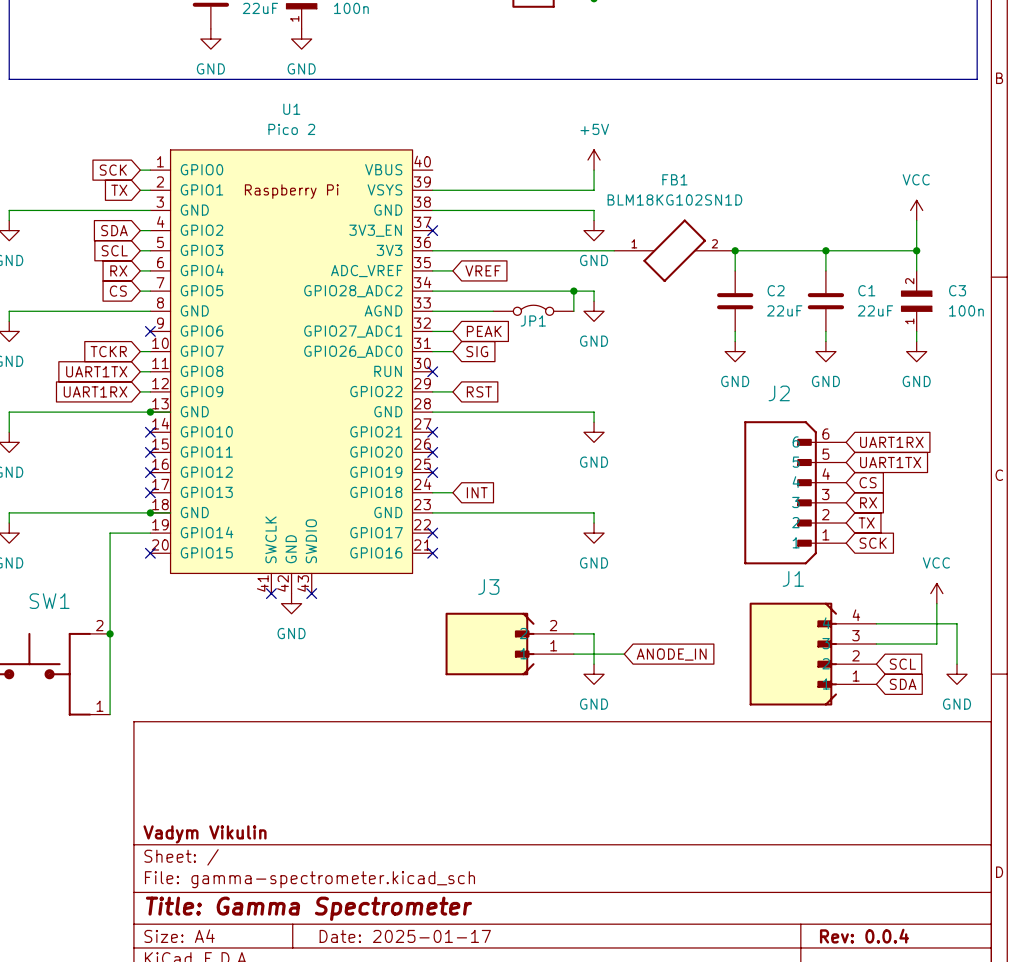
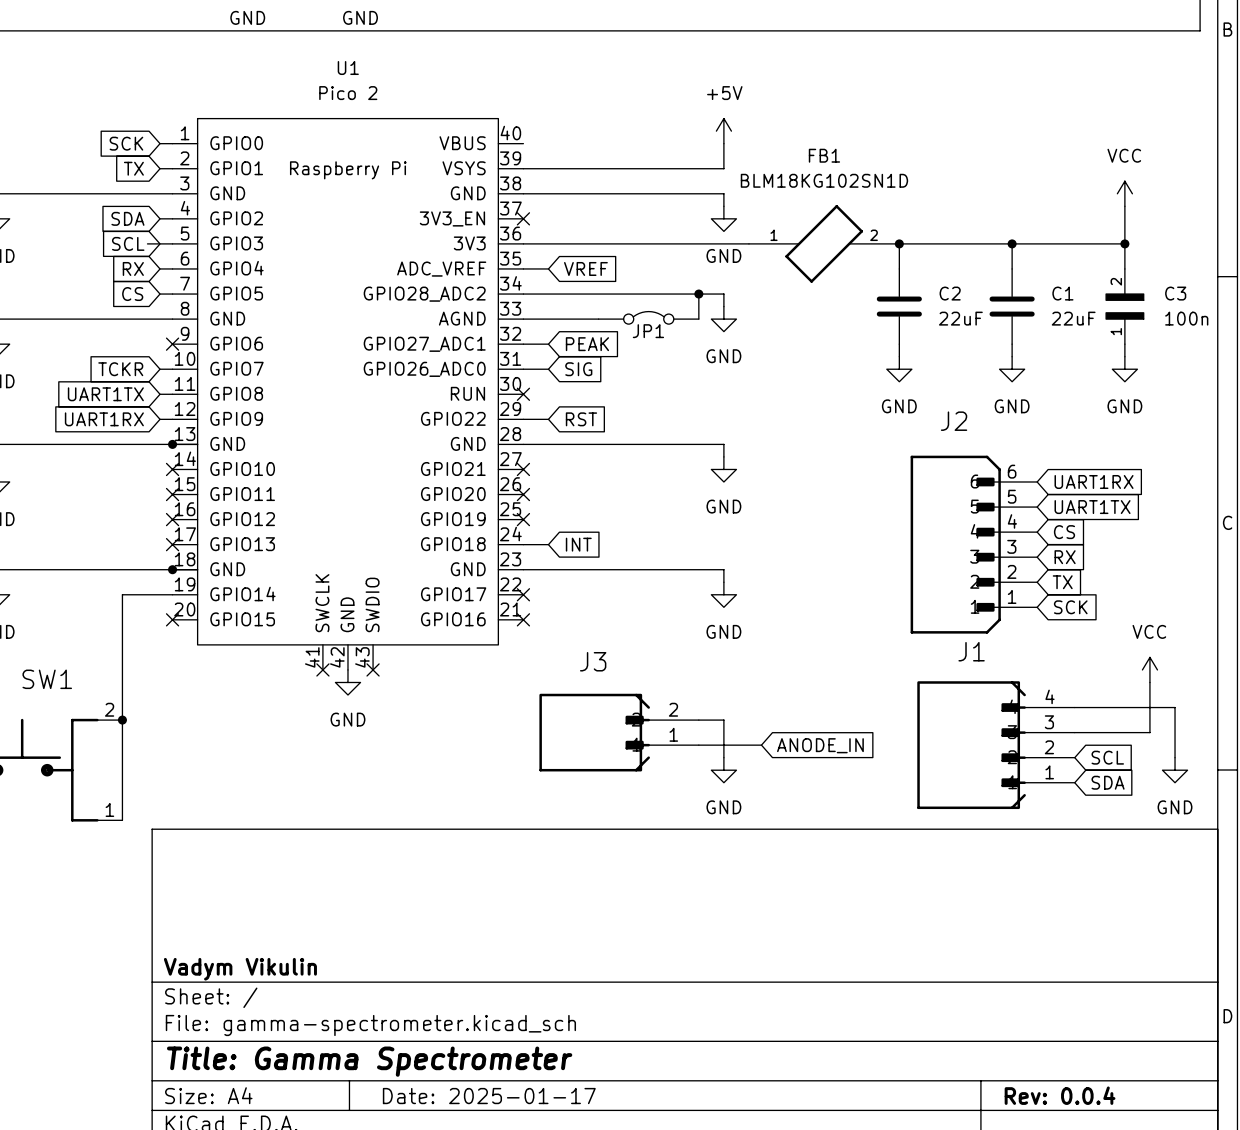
wire: none -> (147, 243) (160, 243)

